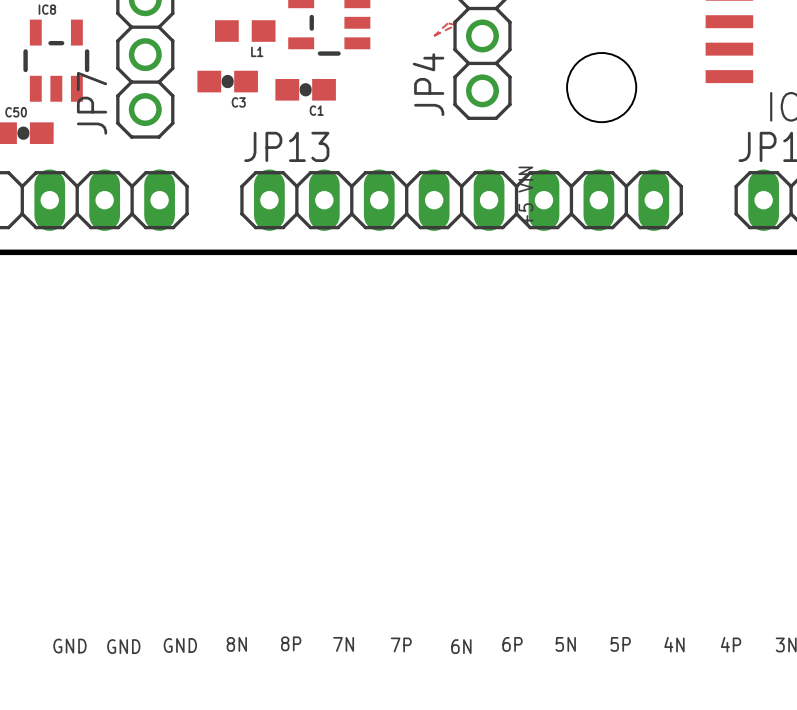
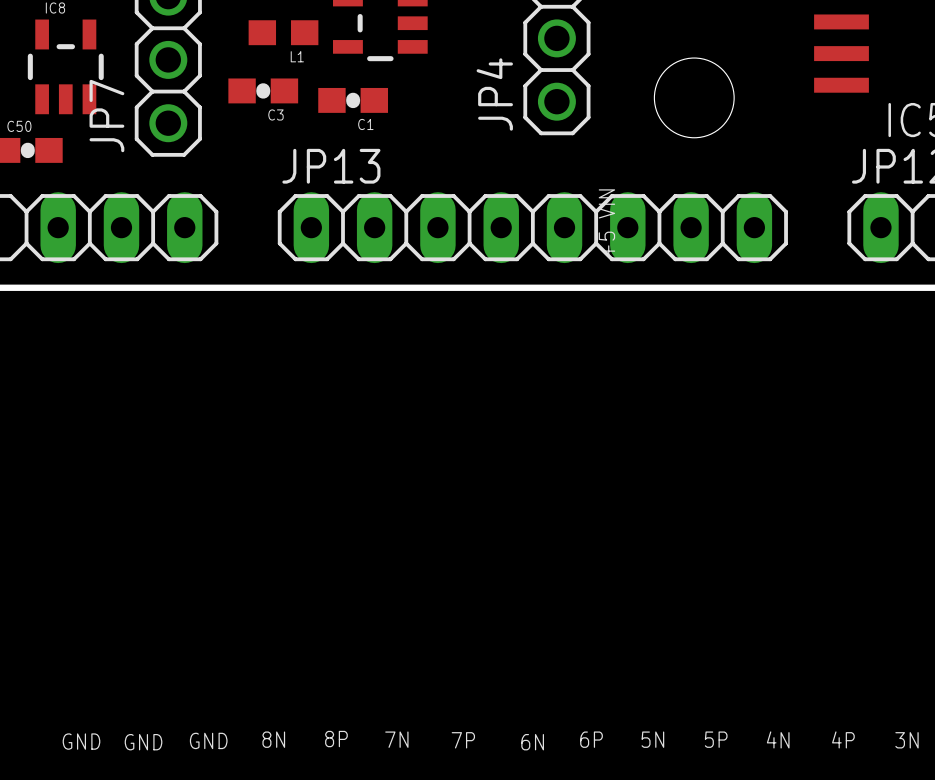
zone outline: (447, 23) (456, 24) (434, 35) (447, 23) -> none

